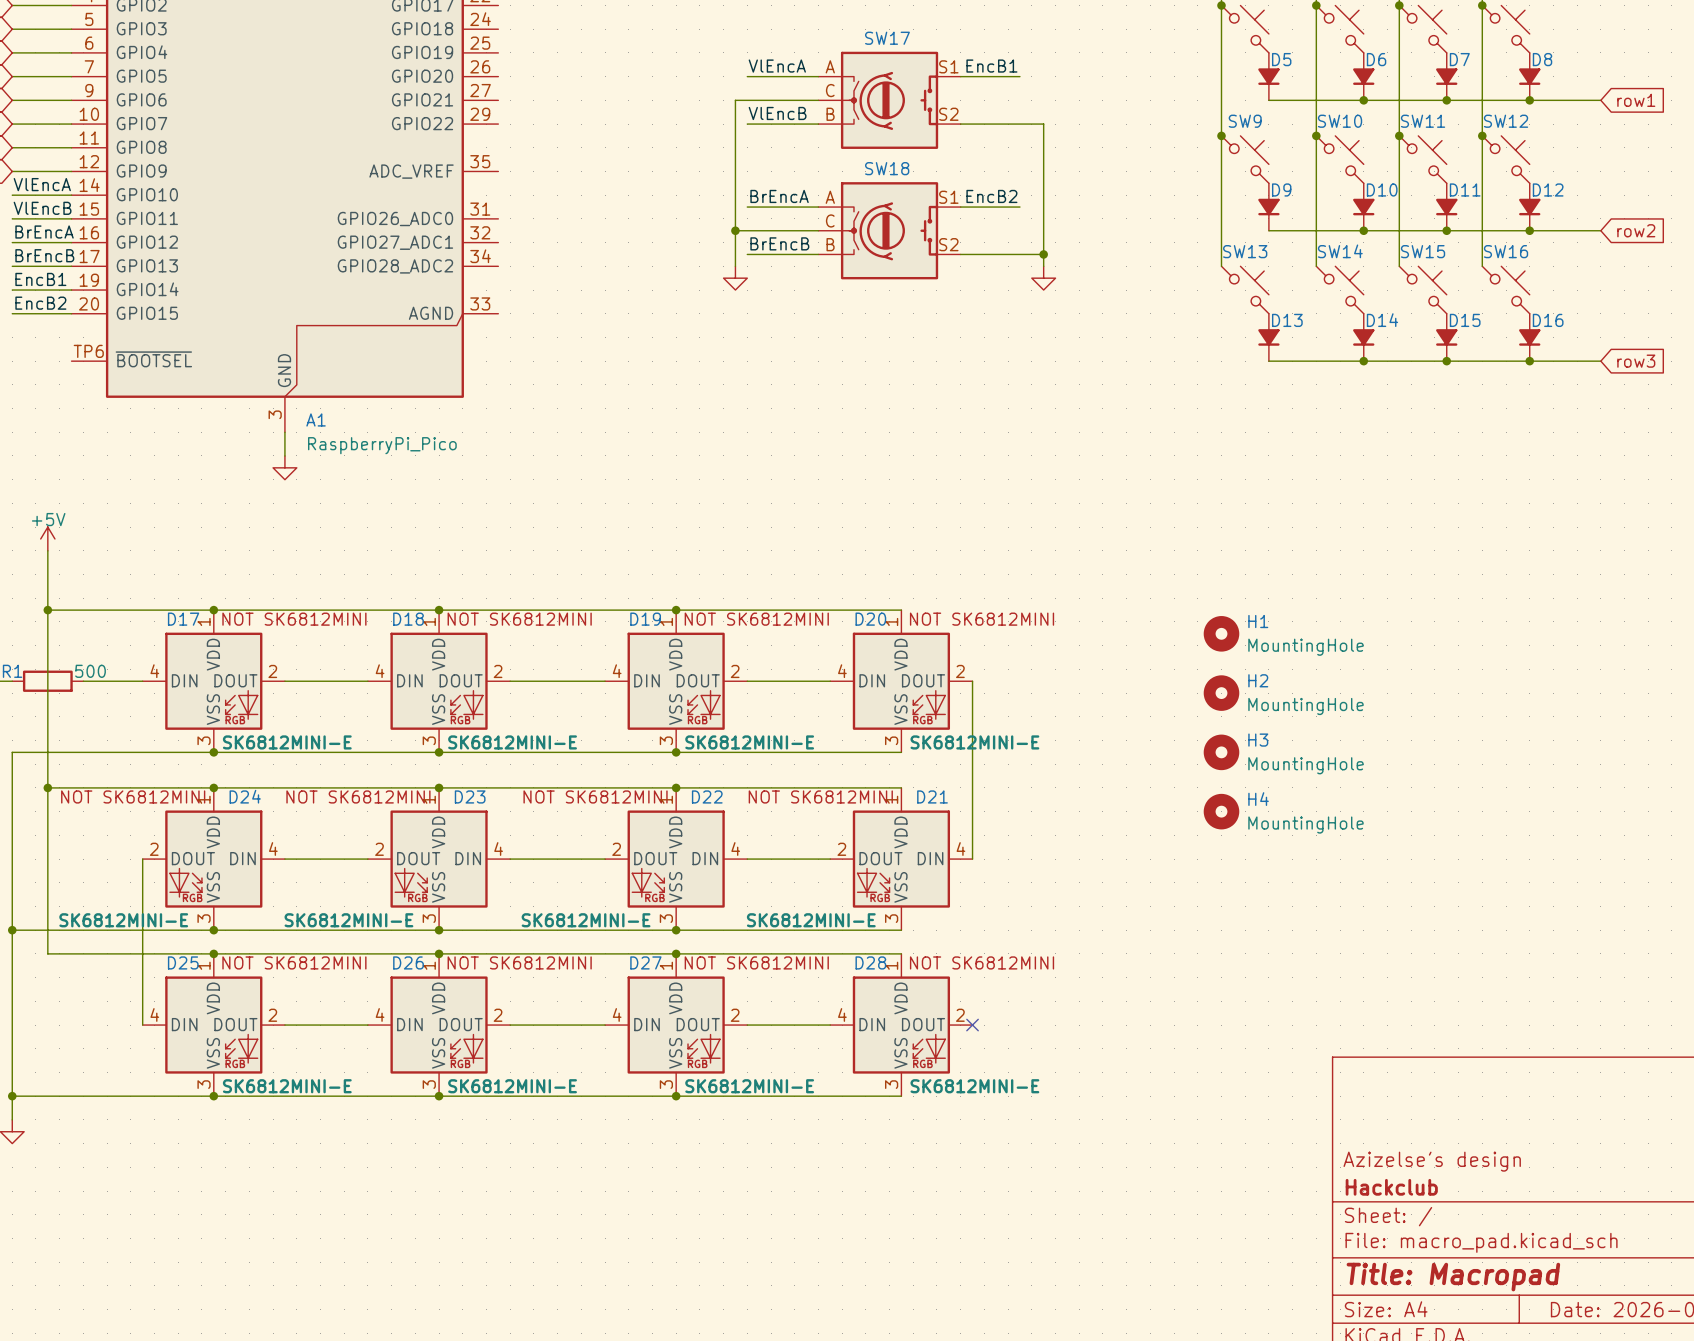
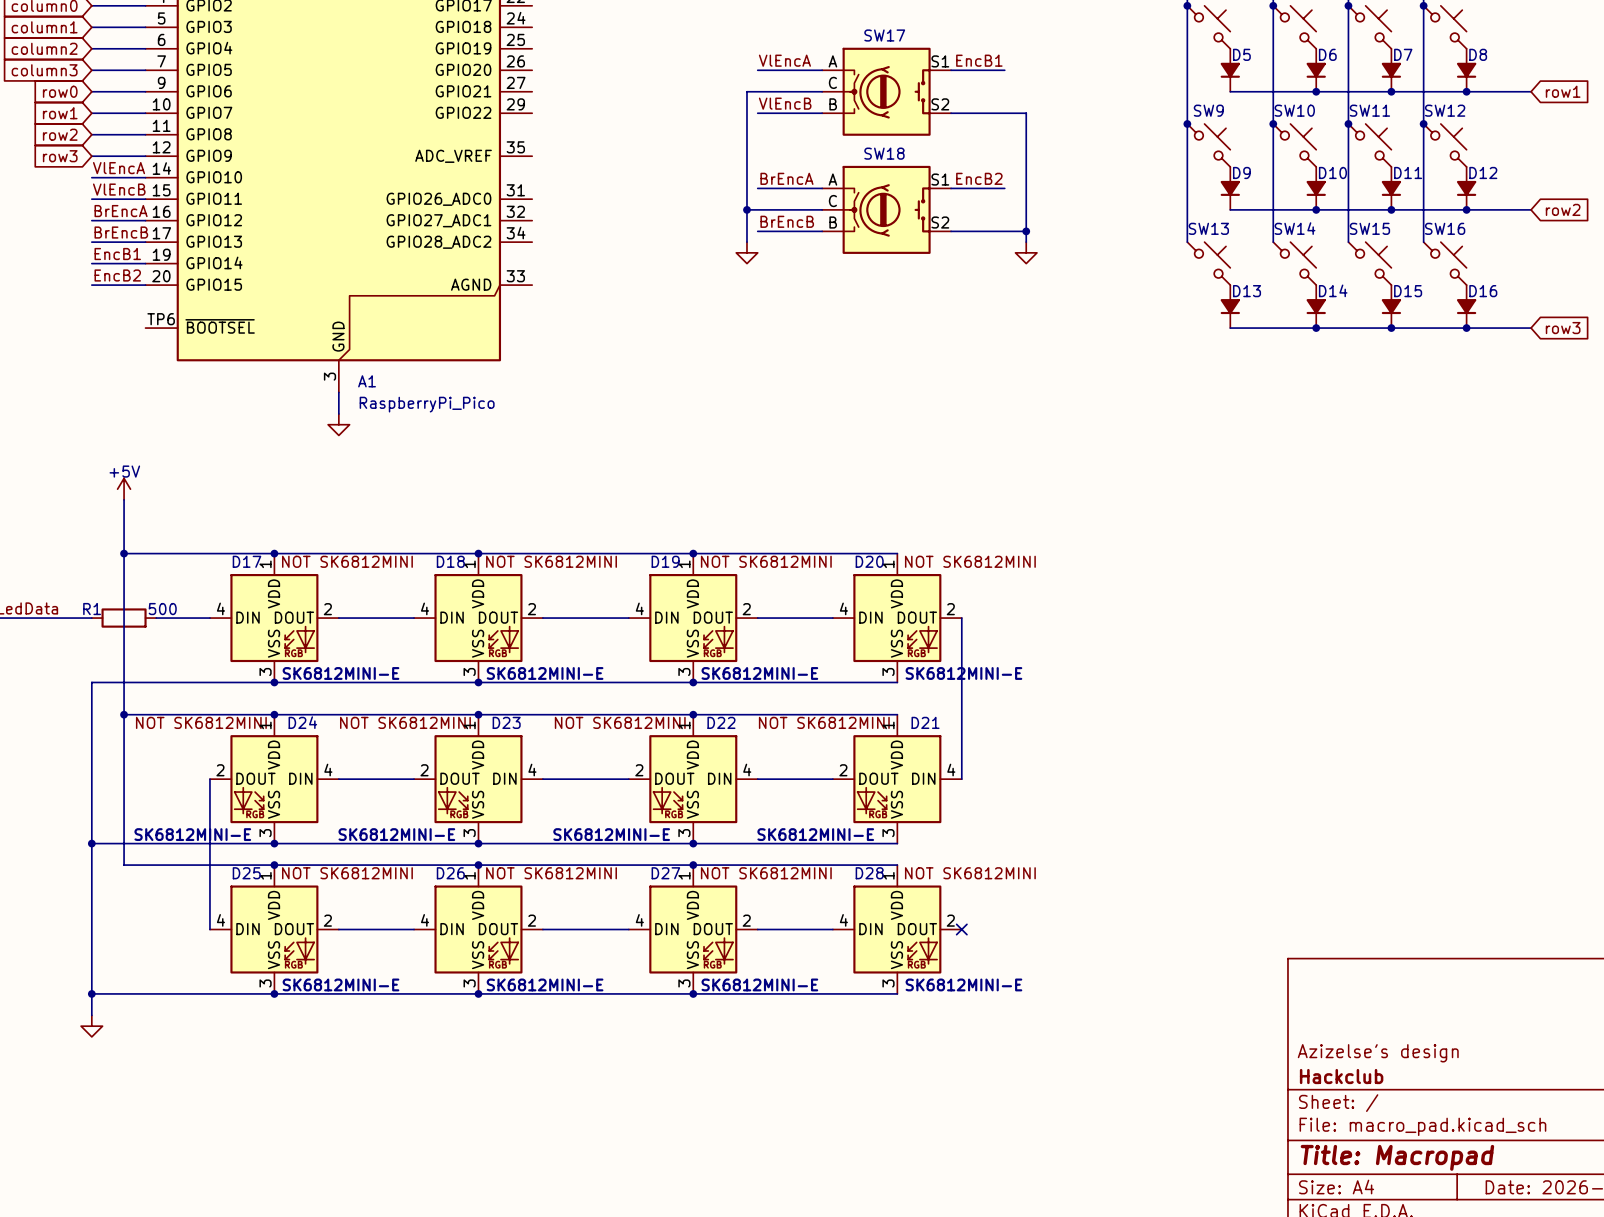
H1: MountingHole (1221, 633) -> none
H2: MountingHole (1221, 693) -> none
H3: MountingHole (1221, 752) -> none
H4: MountingHole (1221, 811) -> none

